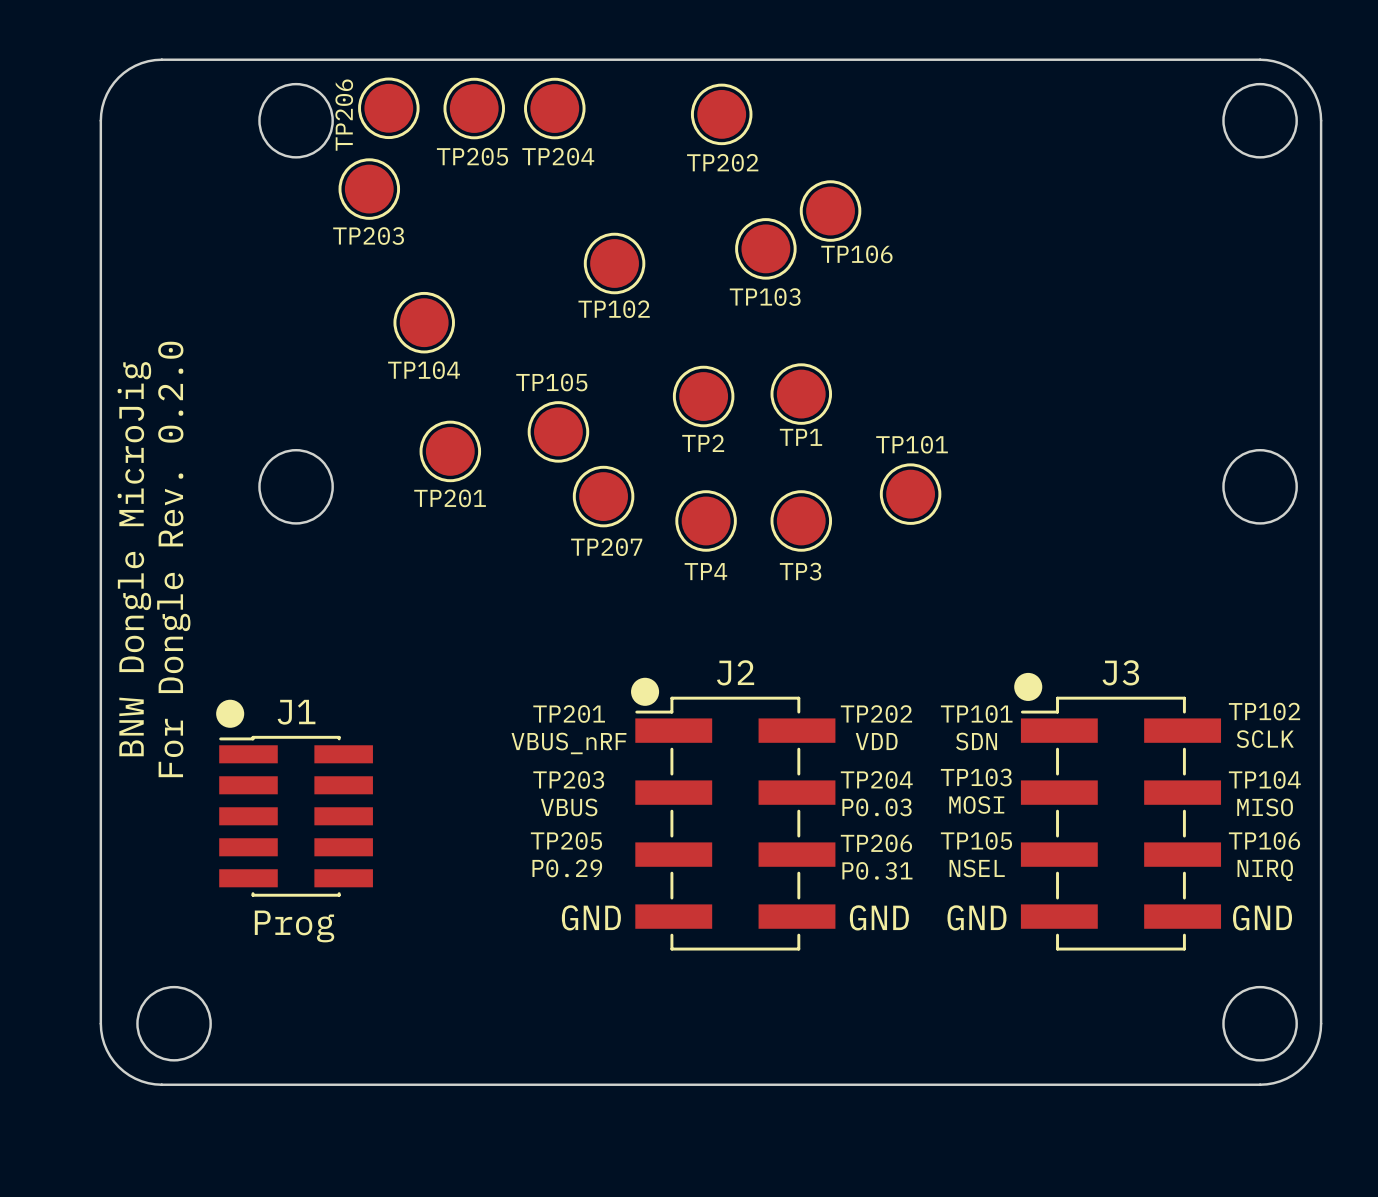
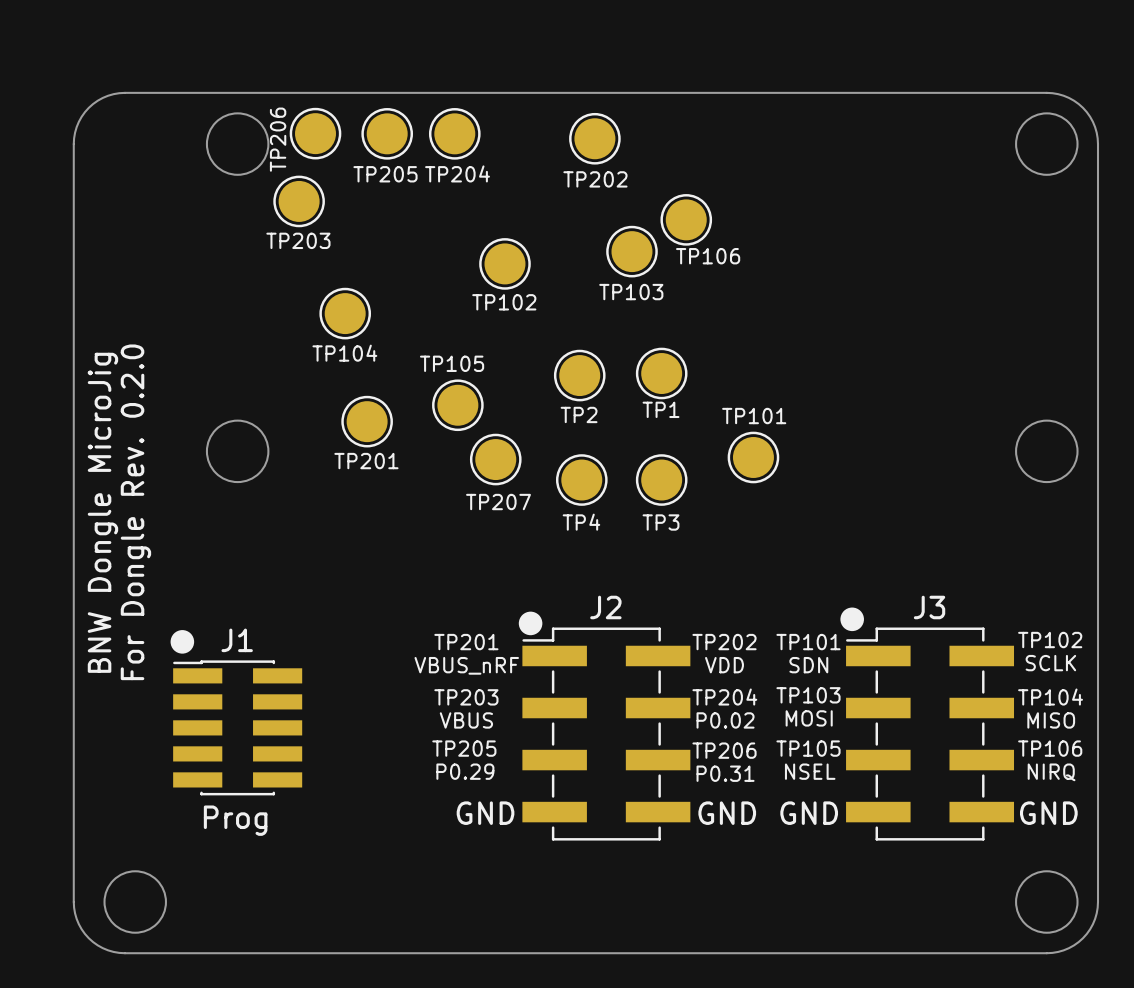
text: P0.03 (877, 807) -> P0.02 (725, 720)

